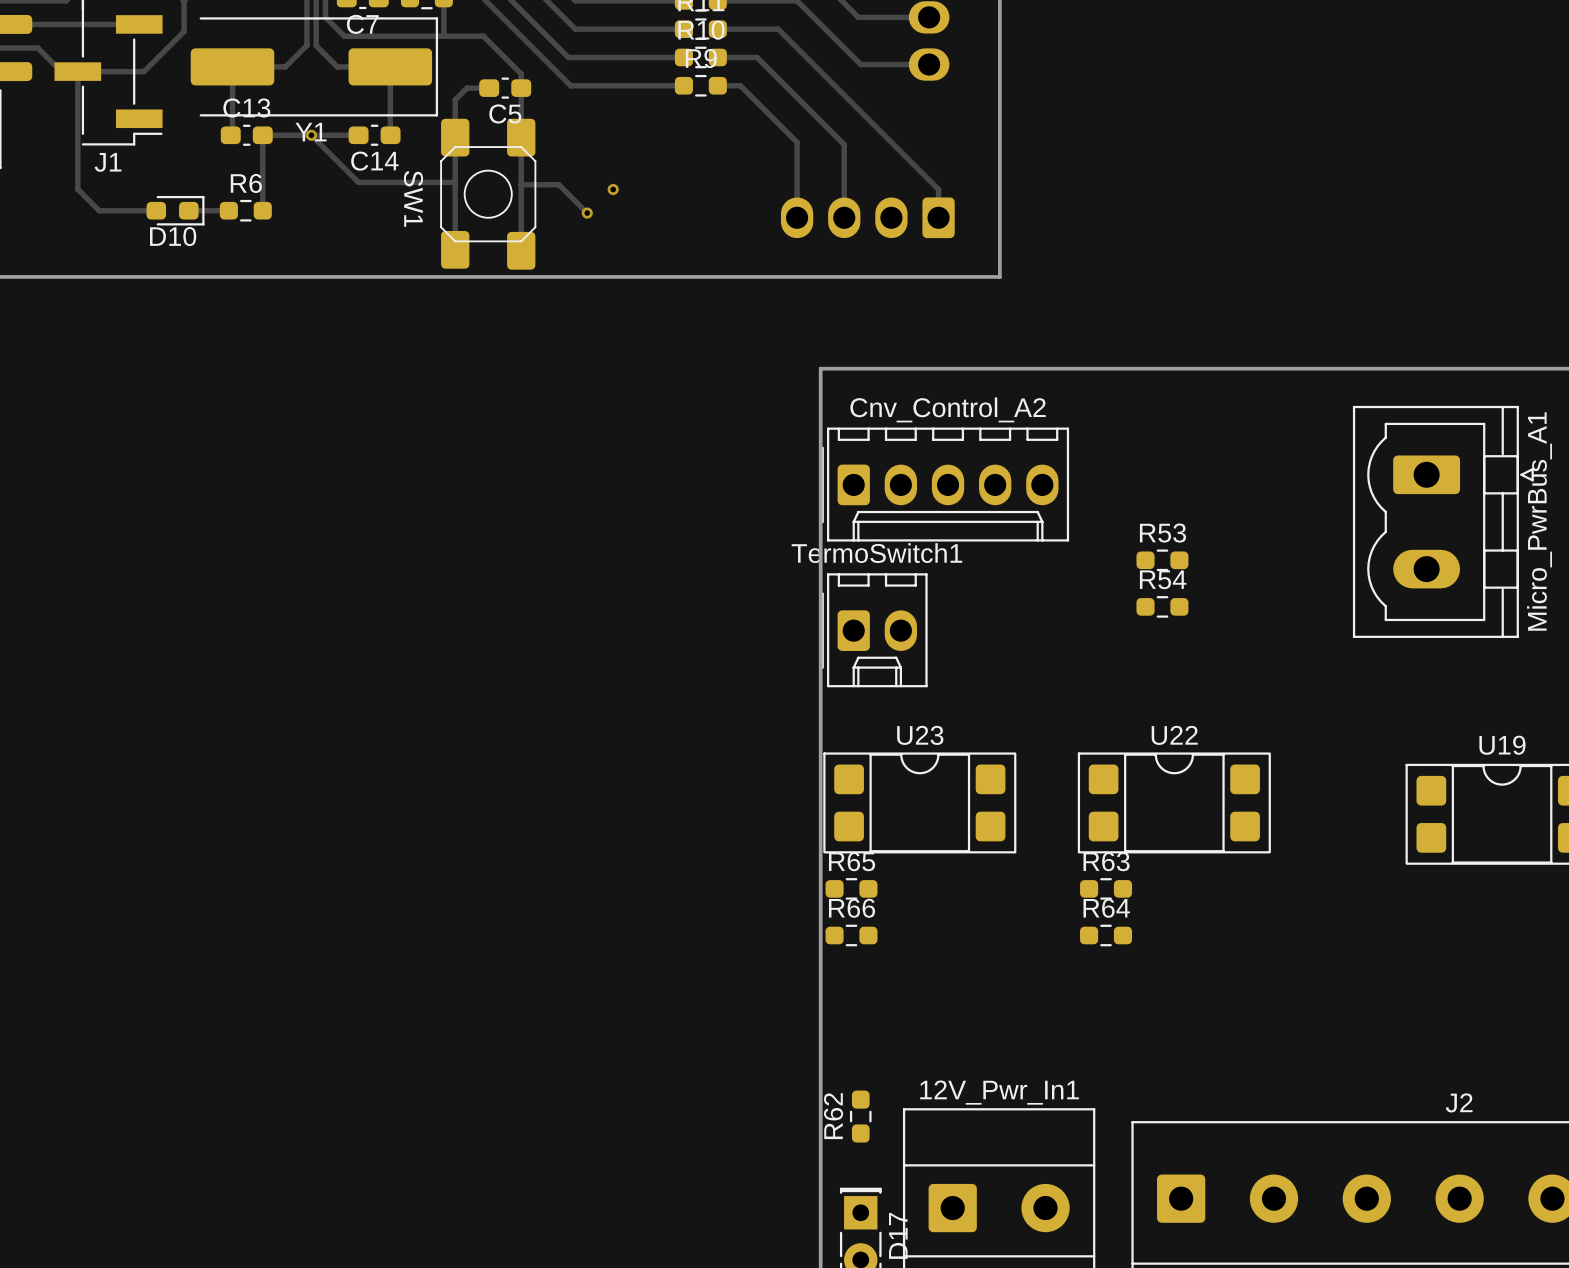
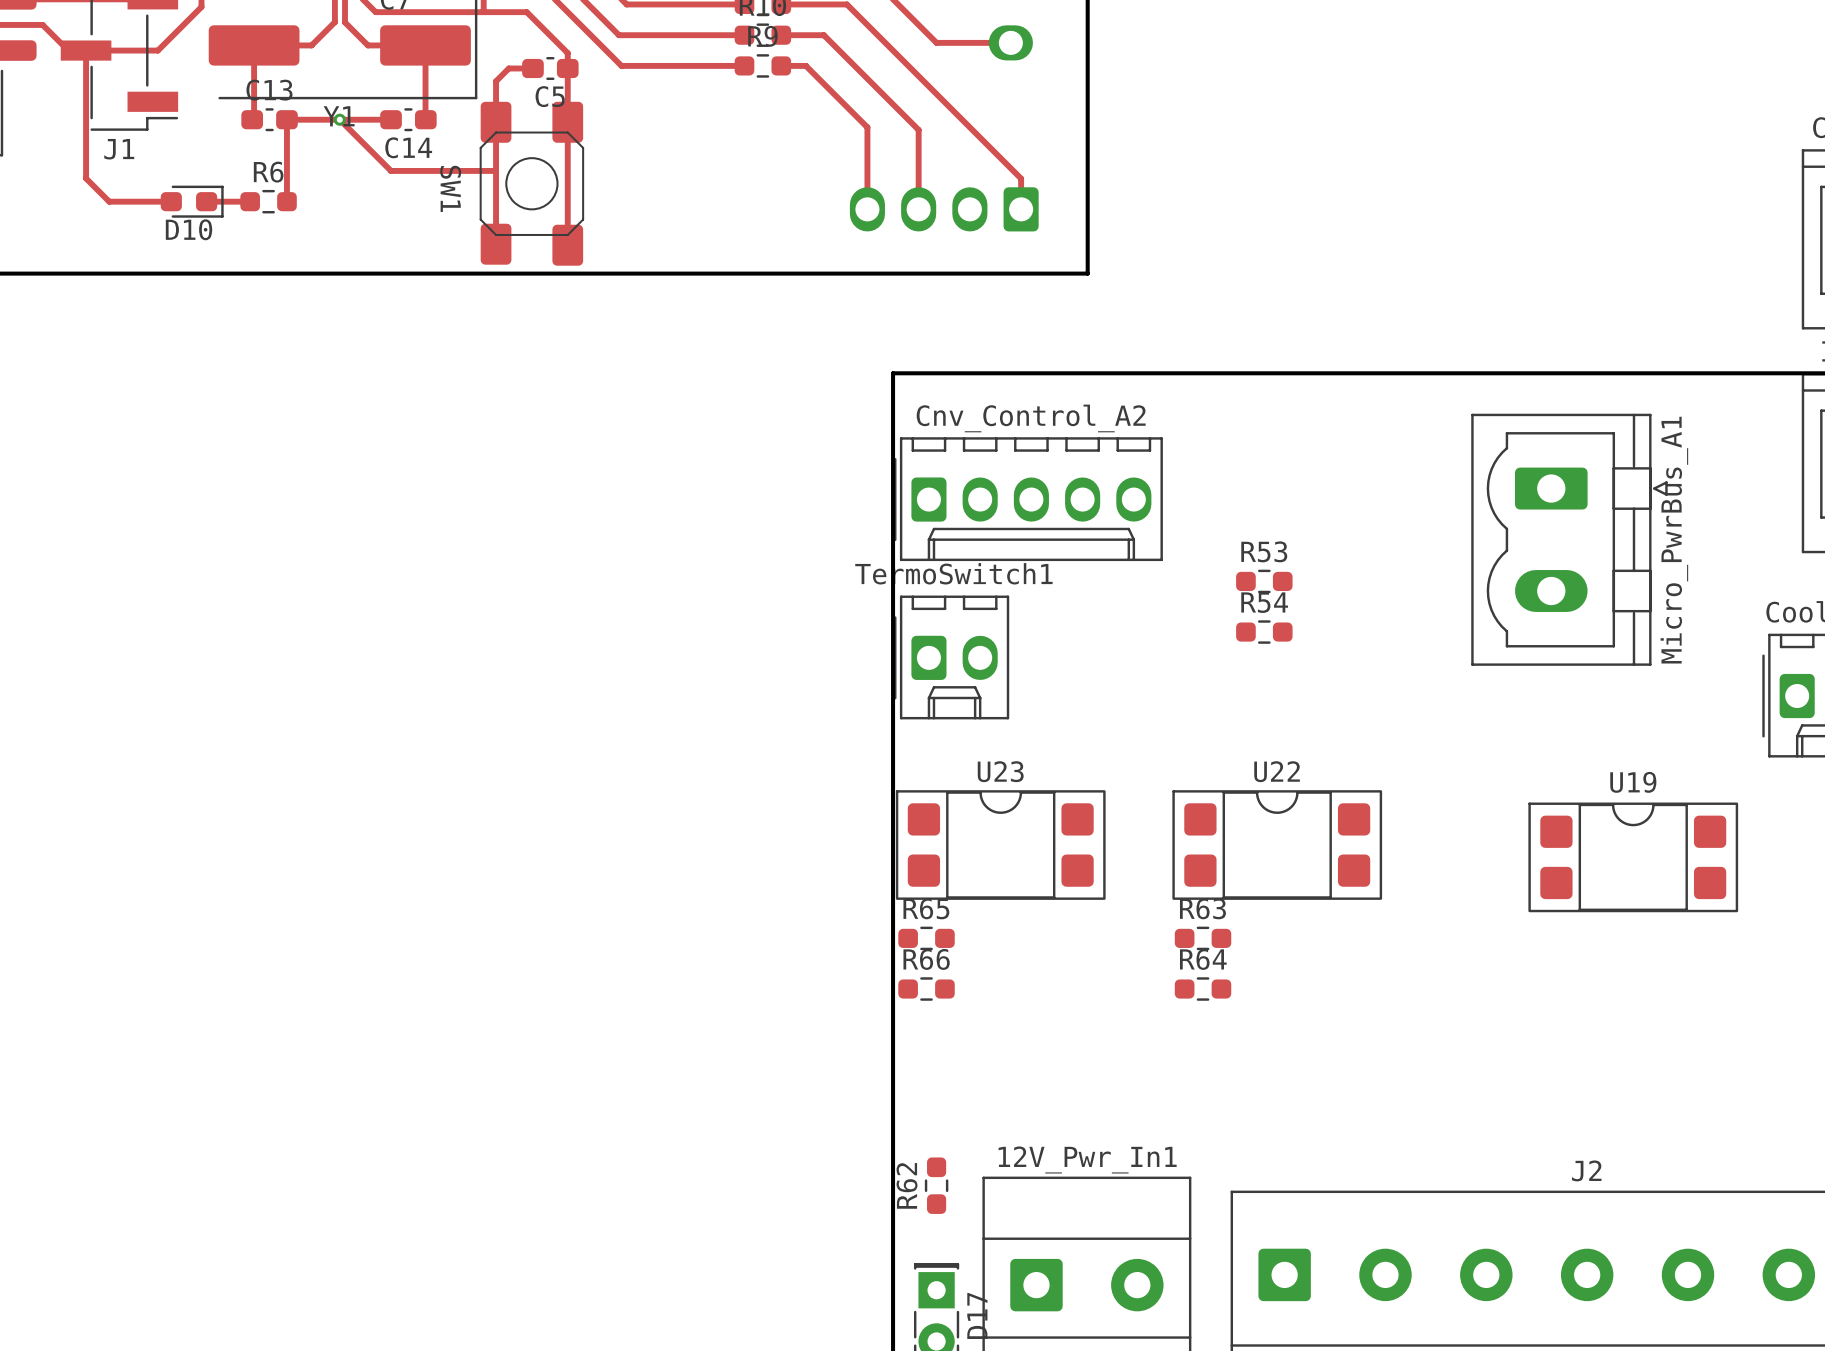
track: (521, 184) (558, 184) (587, 213) -> none
via: (613, 189) -> none
via: (587, 213) -> none

